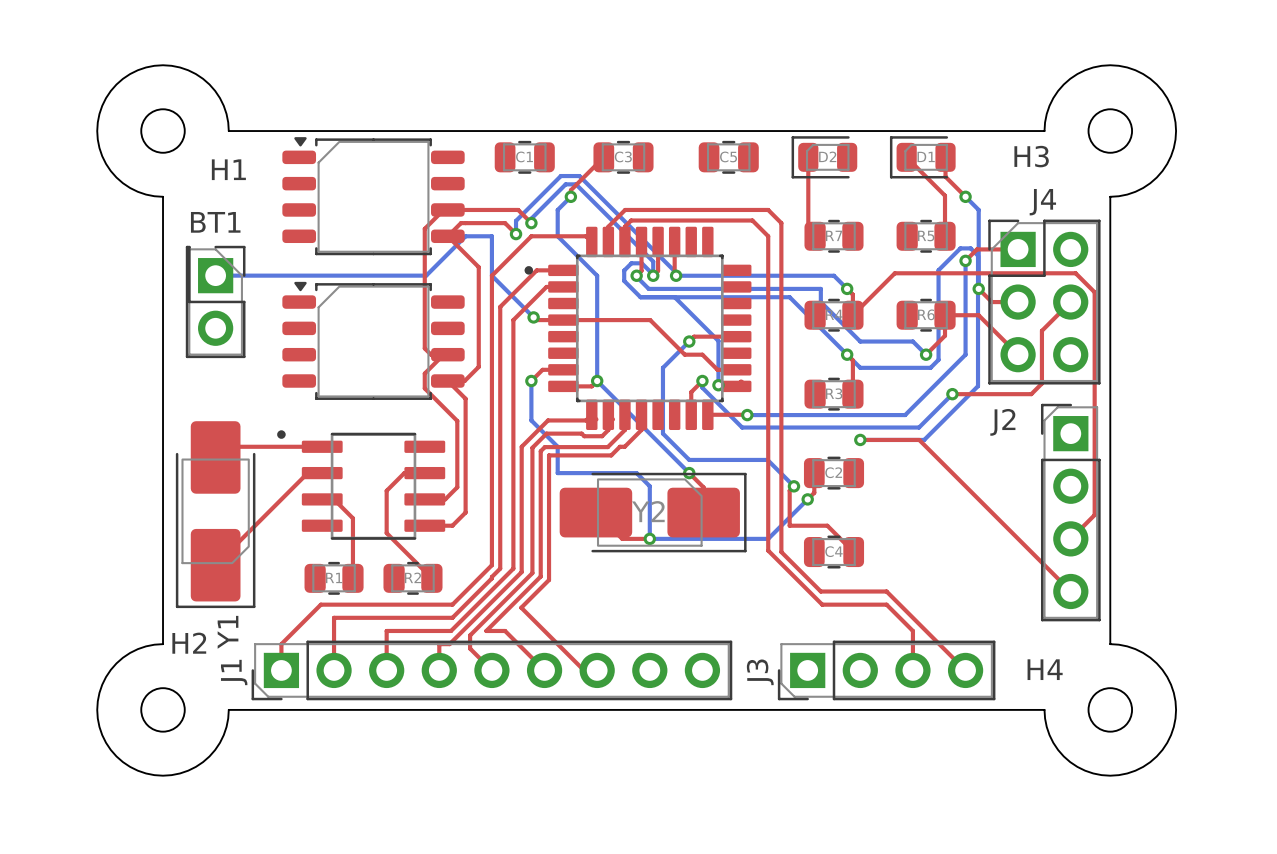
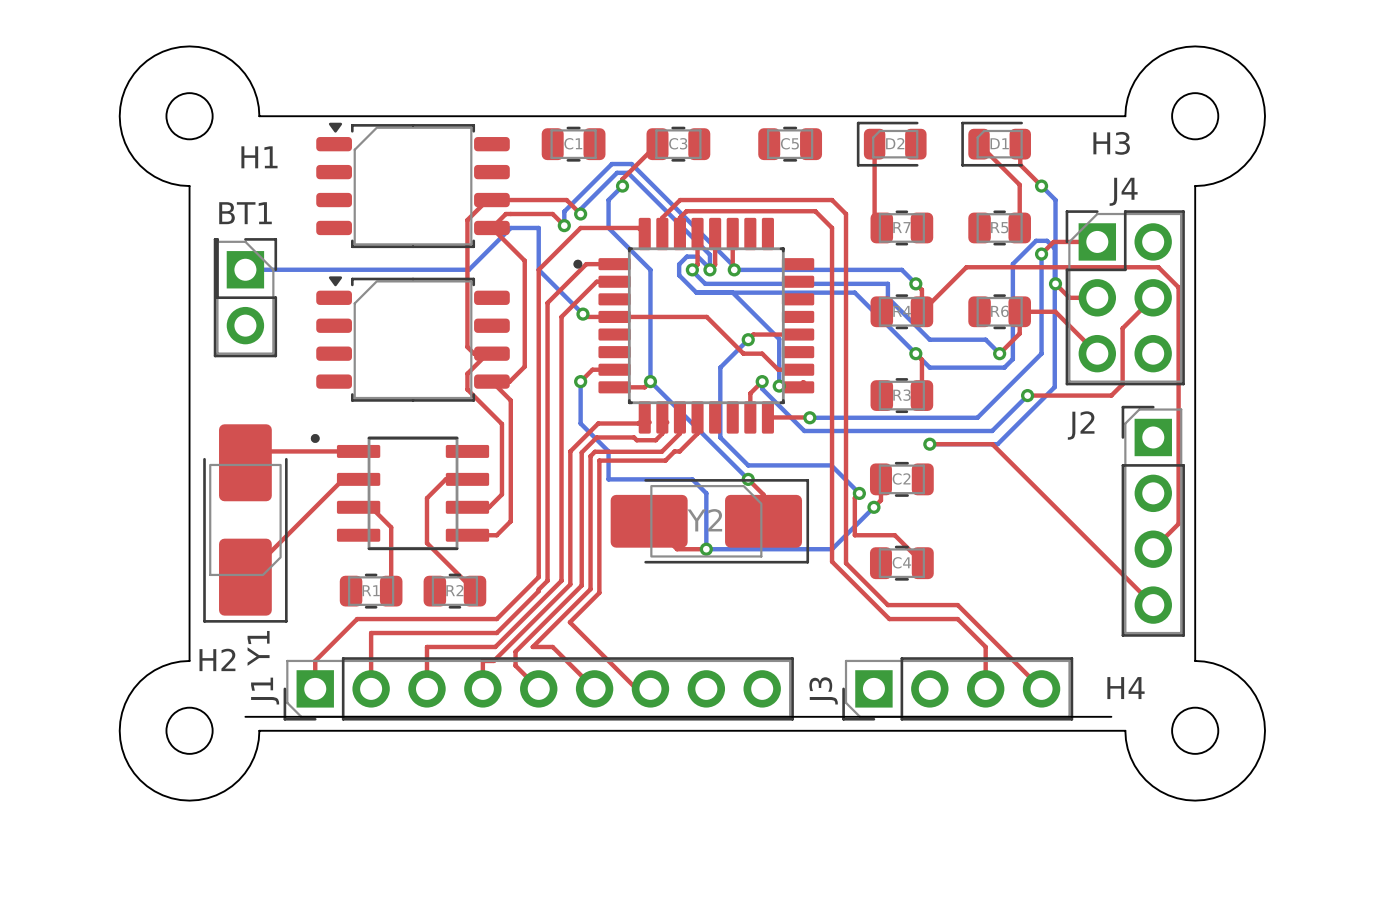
board edge: none -> (245, 716) (1111, 716)

